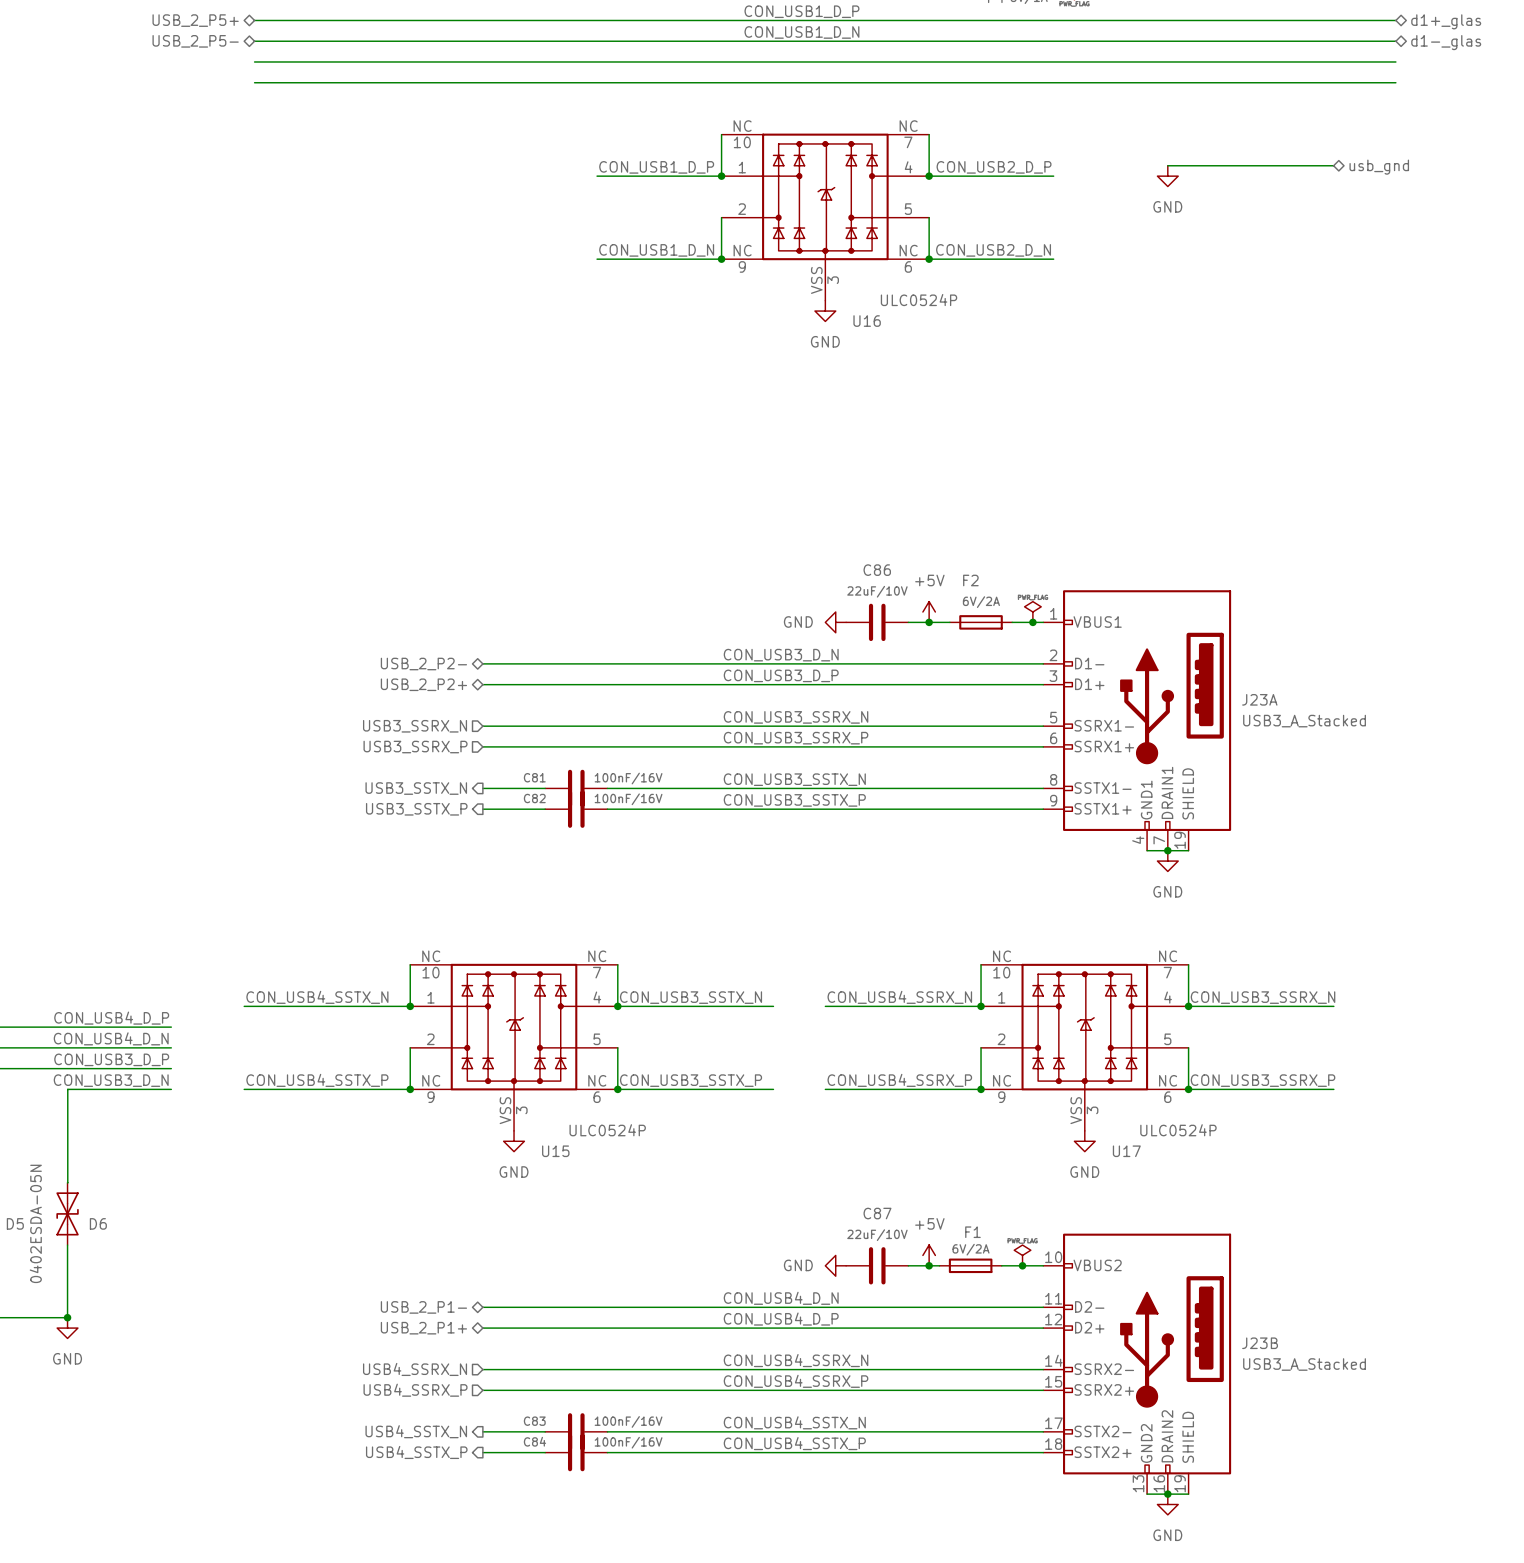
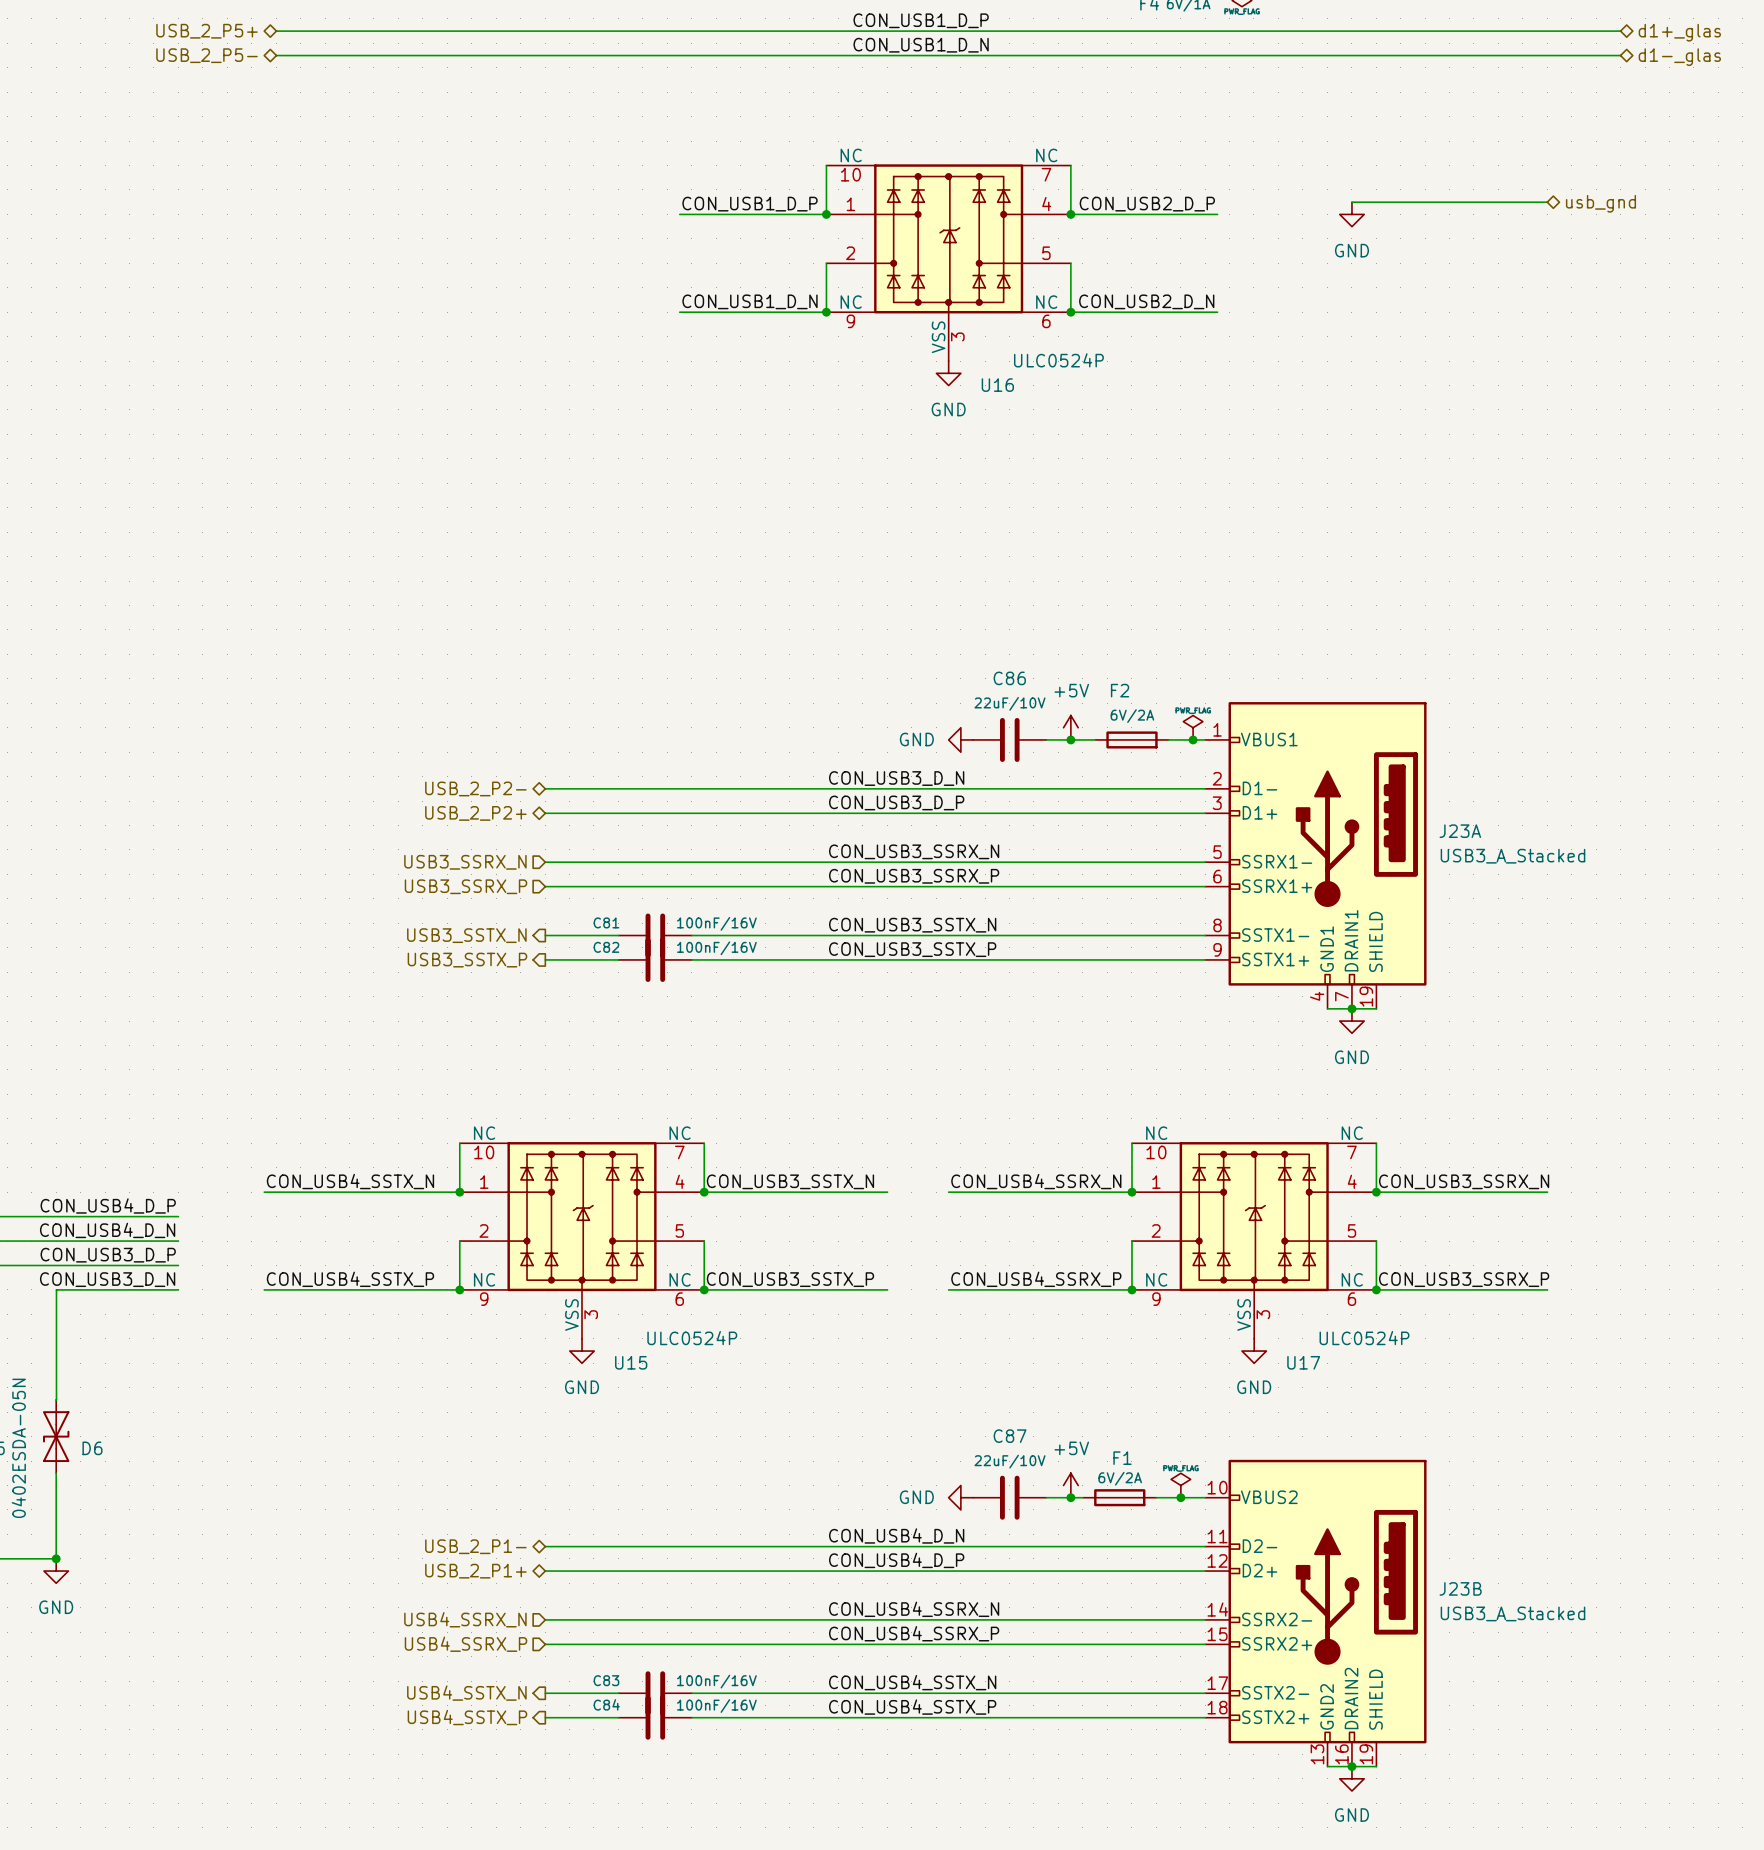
wire: (254, 61) (1395, 61) -> none
wire: (254, 82) (1395, 82) -> none

